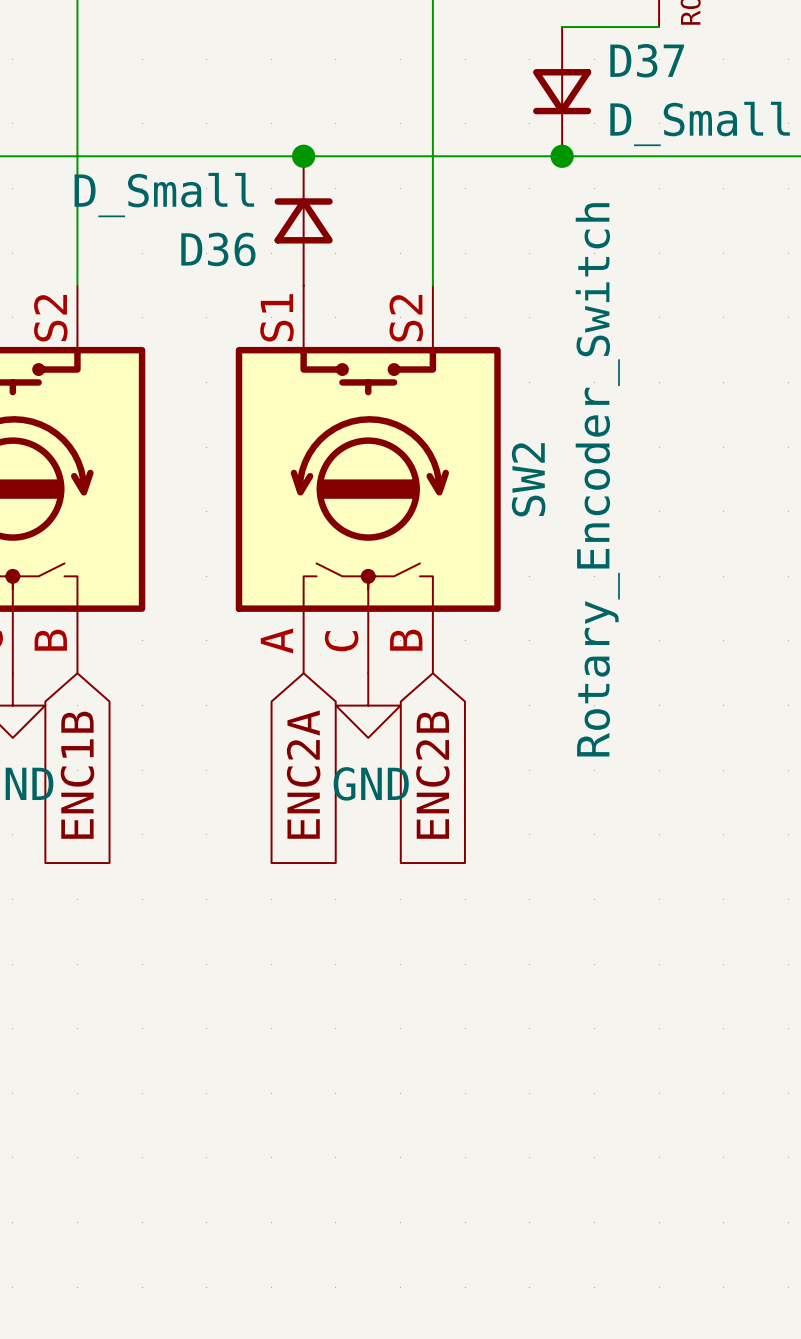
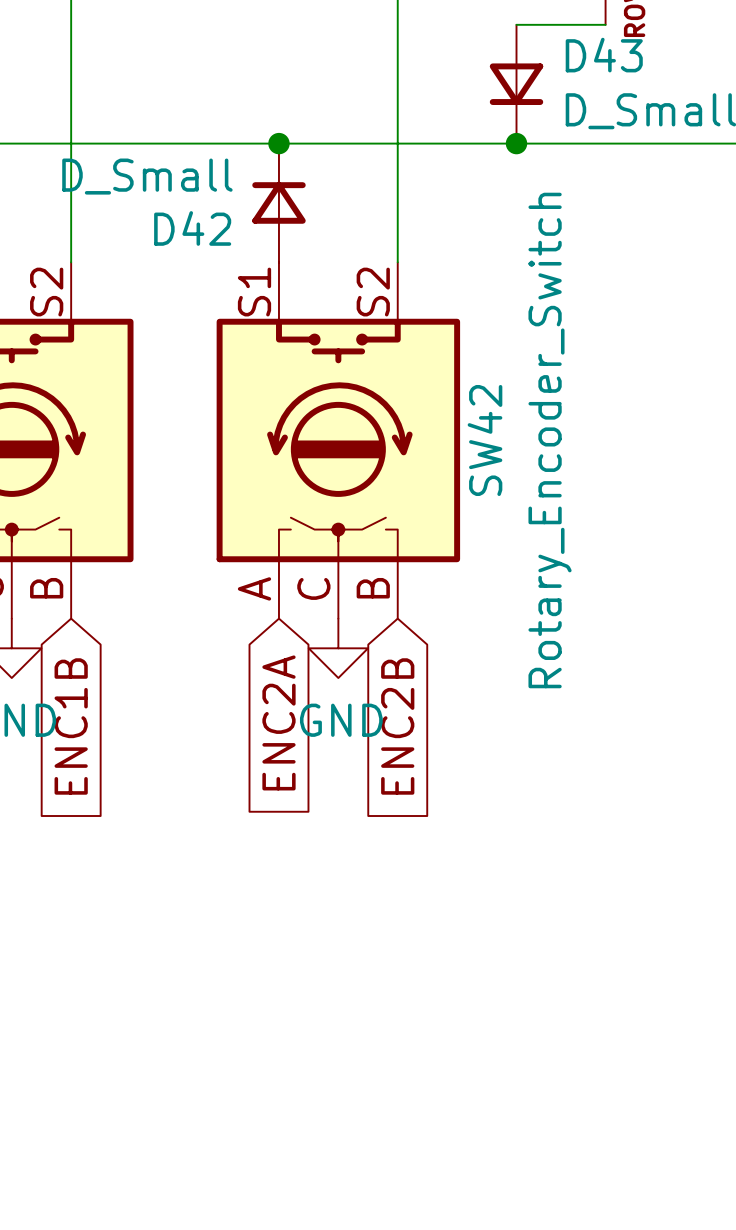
D37 name: D37 (647, 60) -> D43 (604, 55)
D36 name: D36 (218, 249) -> D42 (192, 228)
SW2 name: SW2 (528, 479) -> SW42 (485, 440)

